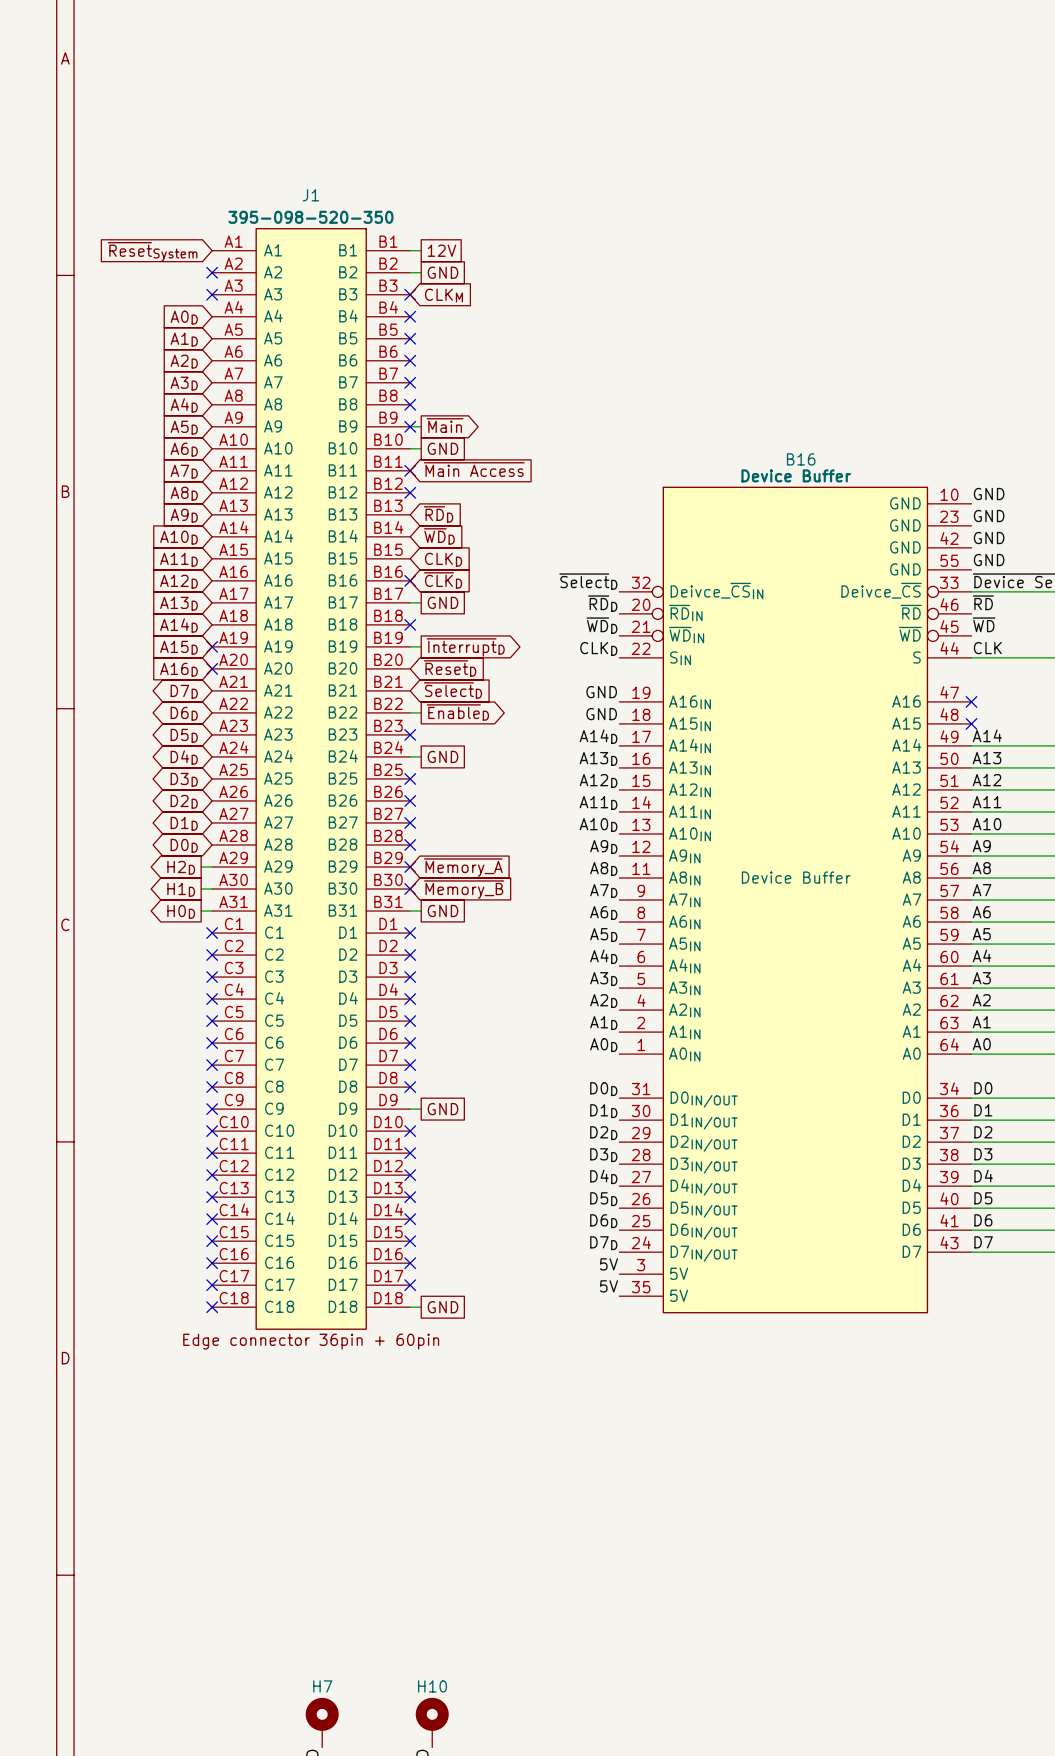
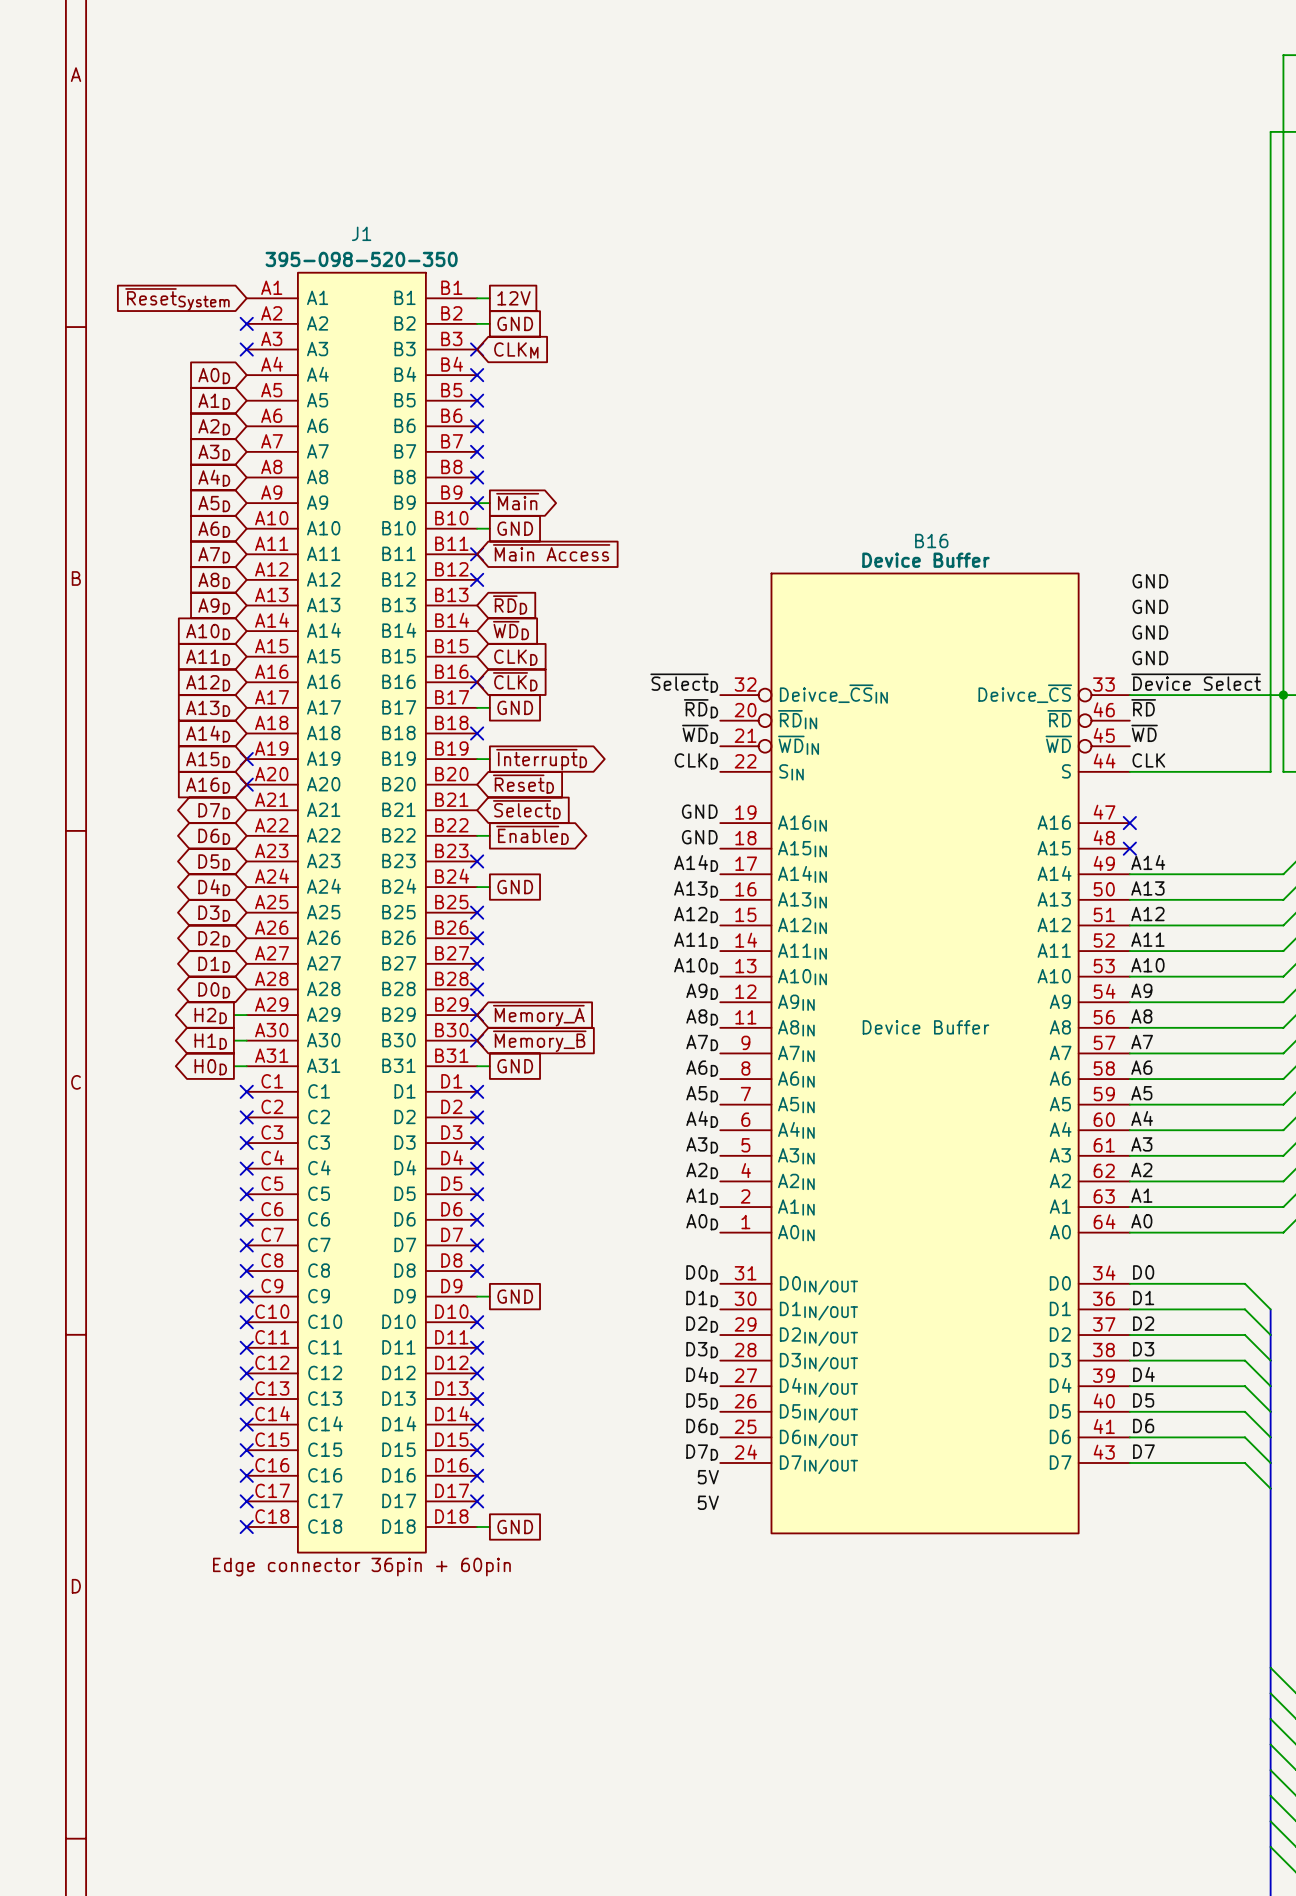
B16 symbol: [619, 486, 972, 1314] -> [720, 572, 1130, 1535]

